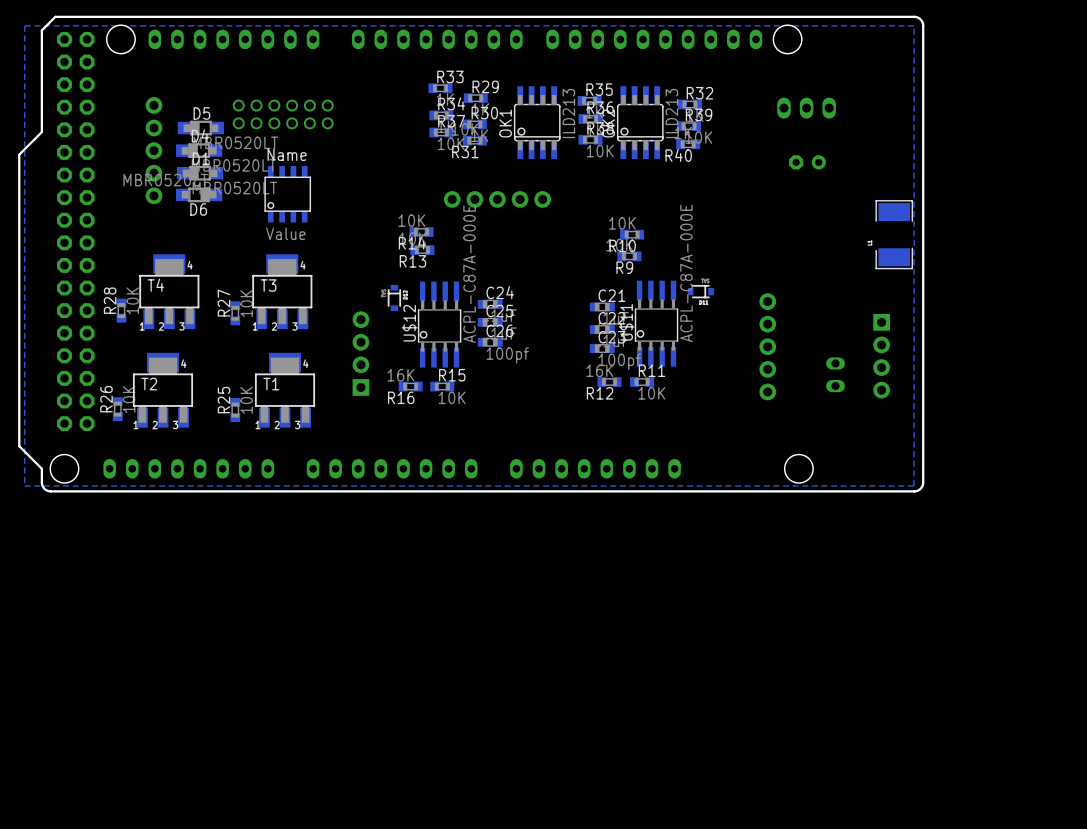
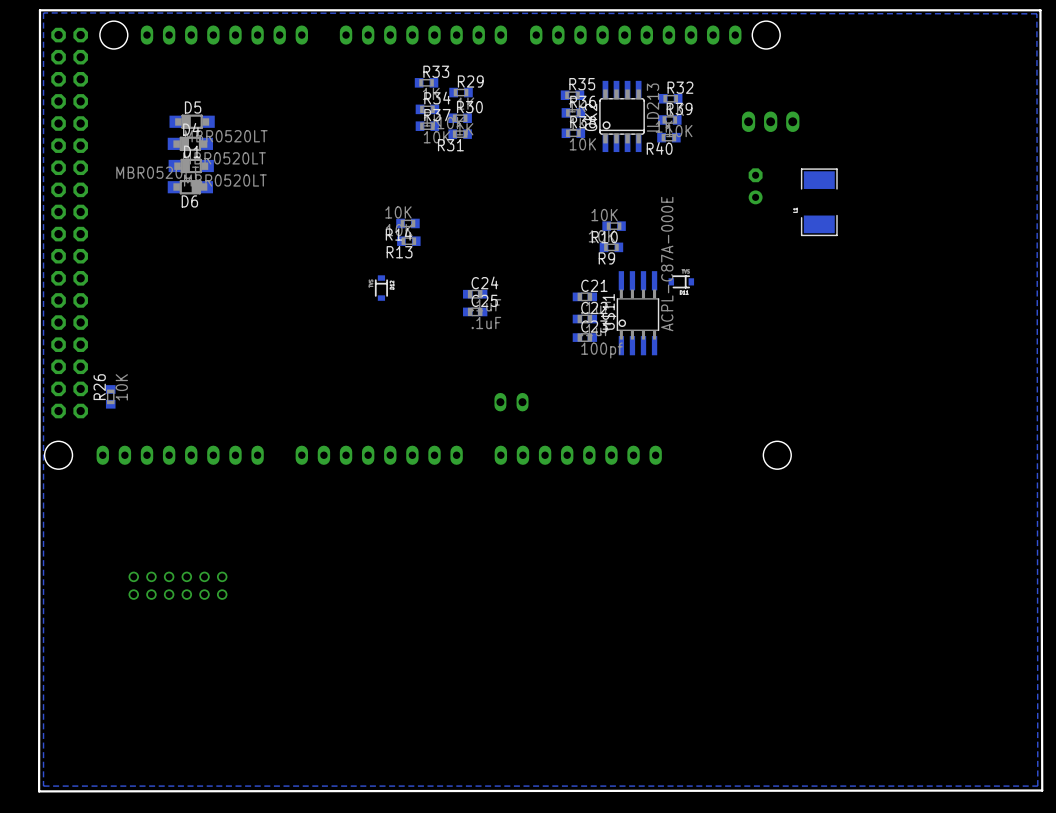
zone outline: none -> (43, 12) (1036, 13) (1037, 786) (43, 786) (43, 12)
board edge: (914, 16) (55, 16) (41, 30) (41, 132) (19, 154) (19, 446) (41, 468) (42, 485) (50, 491) (917, 490) (923, 482) (923, 25) (920, 19) (914, 16) -> none
zone outline: (914, 25) (24, 25) (24, 485) (914, 485) (914, 25) -> none
part position: (806, 108) -> (770, 121)
part: (283, 114) -> none
board edge: none -> (39, 116) (39, 10) (1040, 10) (1042, 790) (39, 791) (39, 116)
OK1: ILD213 (537, 122) -> none
part: (153, 150) -> none
part rotation: 0° (807, 162) -> 90° clockwise (755, 186)
part position: (807, 162) -> (755, 186)
part: (287, 194) -> none
part: (497, 199) -> none
part position: (894, 234) -> (819, 202)
T4: (169, 291) -> none
T3: (282, 291) -> none
R28: 10K (121, 310) -> none
R27: 10K (235, 313) -> none
U$12: ACPL-C87A-000E (439, 324) -> none
C26: 100pf (490, 342) -> none
part: (767, 346) -> none
part: (360, 353) -> none
part: (881, 356) -> none
part: (835, 374) -> none
R12: 16K (609, 382) -> none
R11: 10K (642, 382) -> none
R16: 16K (410, 386) -> none
R15: 10K (442, 386) -> none
T2: (163, 390) -> none
T1: (285, 390) -> none
R25: 10K (235, 410) -> none
part: none -> (511, 402)
part: none -> (177, 585)

